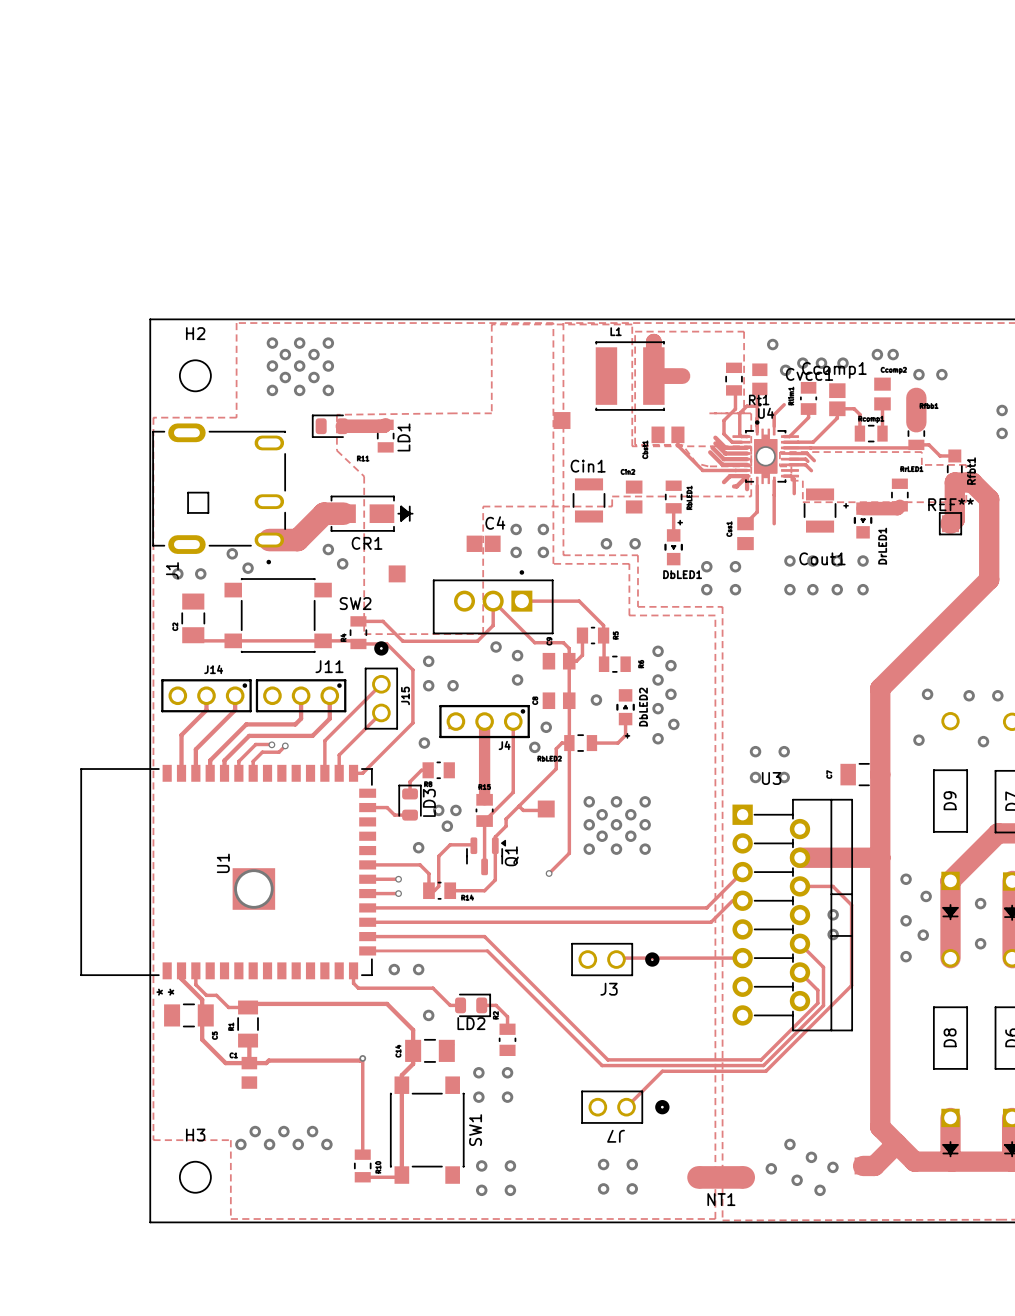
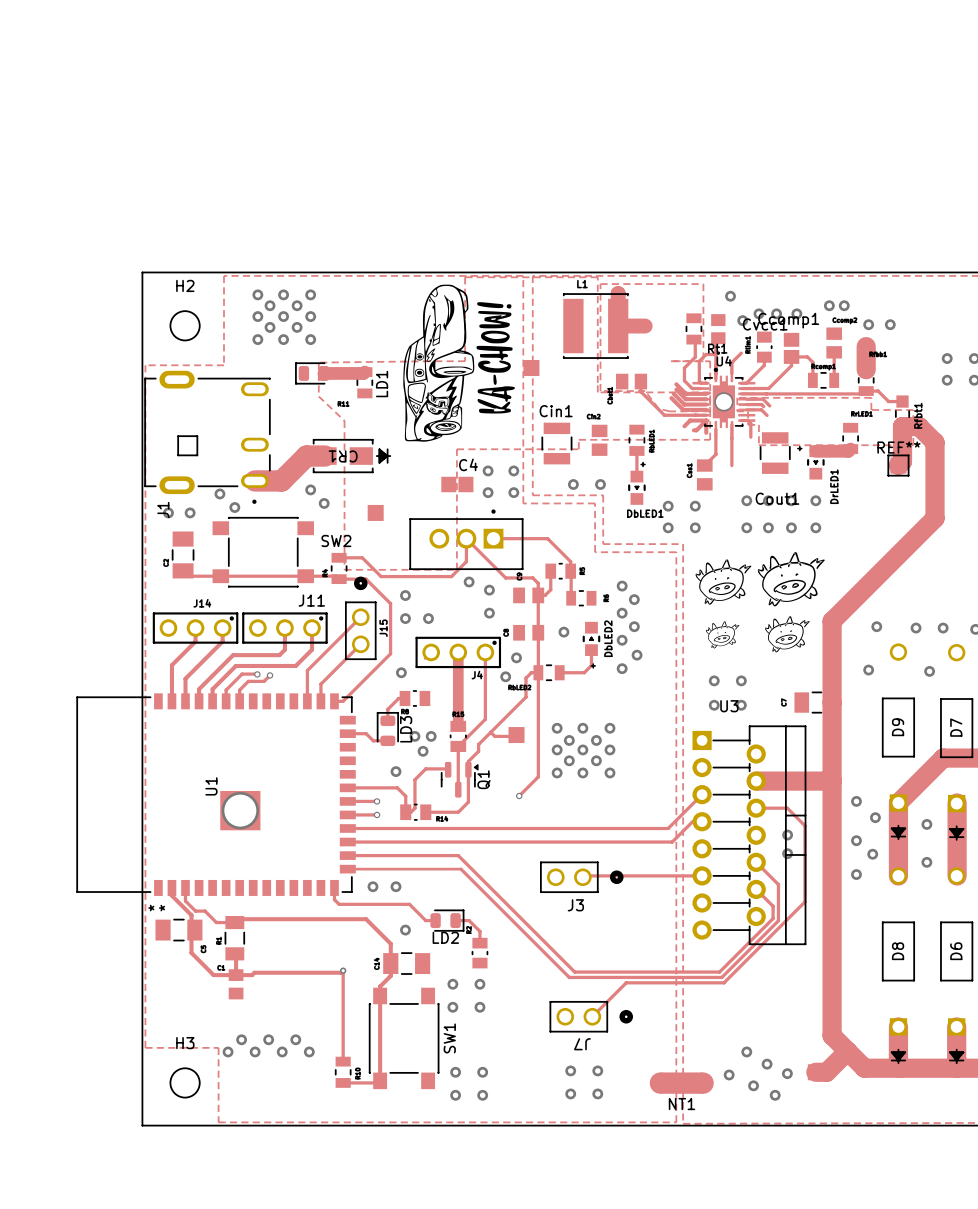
drawing: none -> [403, 284, 515, 442]
CR1 name rotation: 0° (367, 543) -> 180° (343, 456)
drawing: none -> [695, 552, 825, 653]
drawing: none -> [705, 621, 740, 649]

